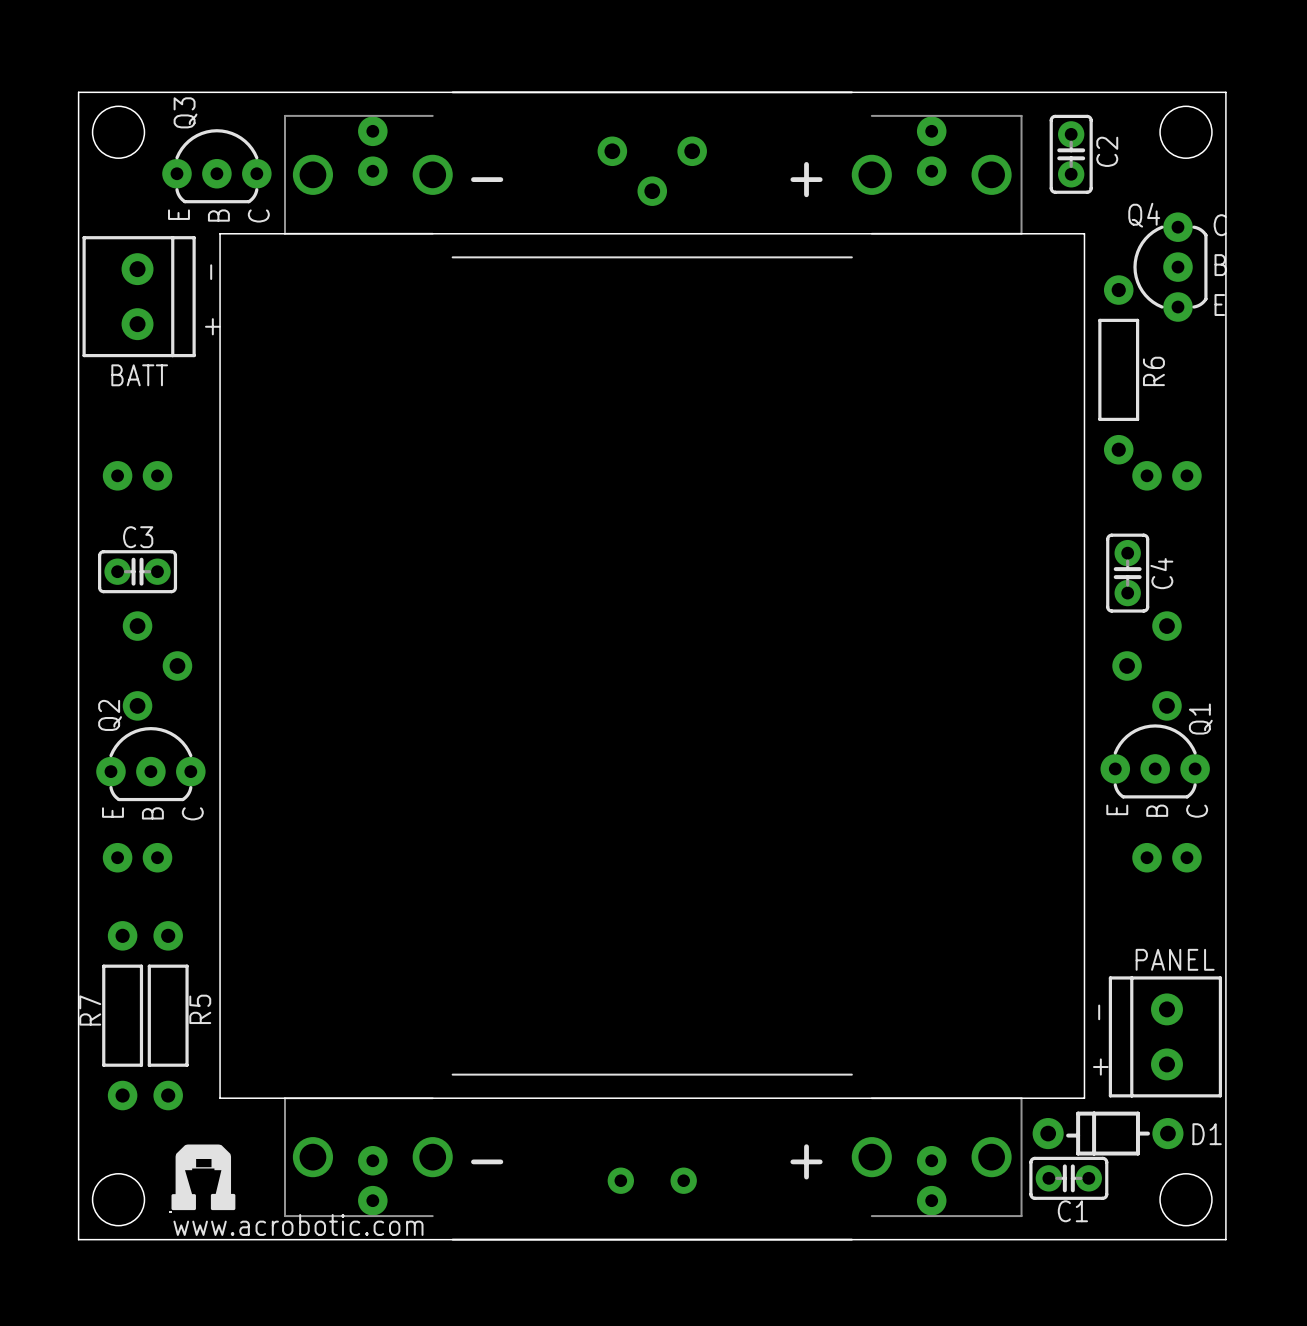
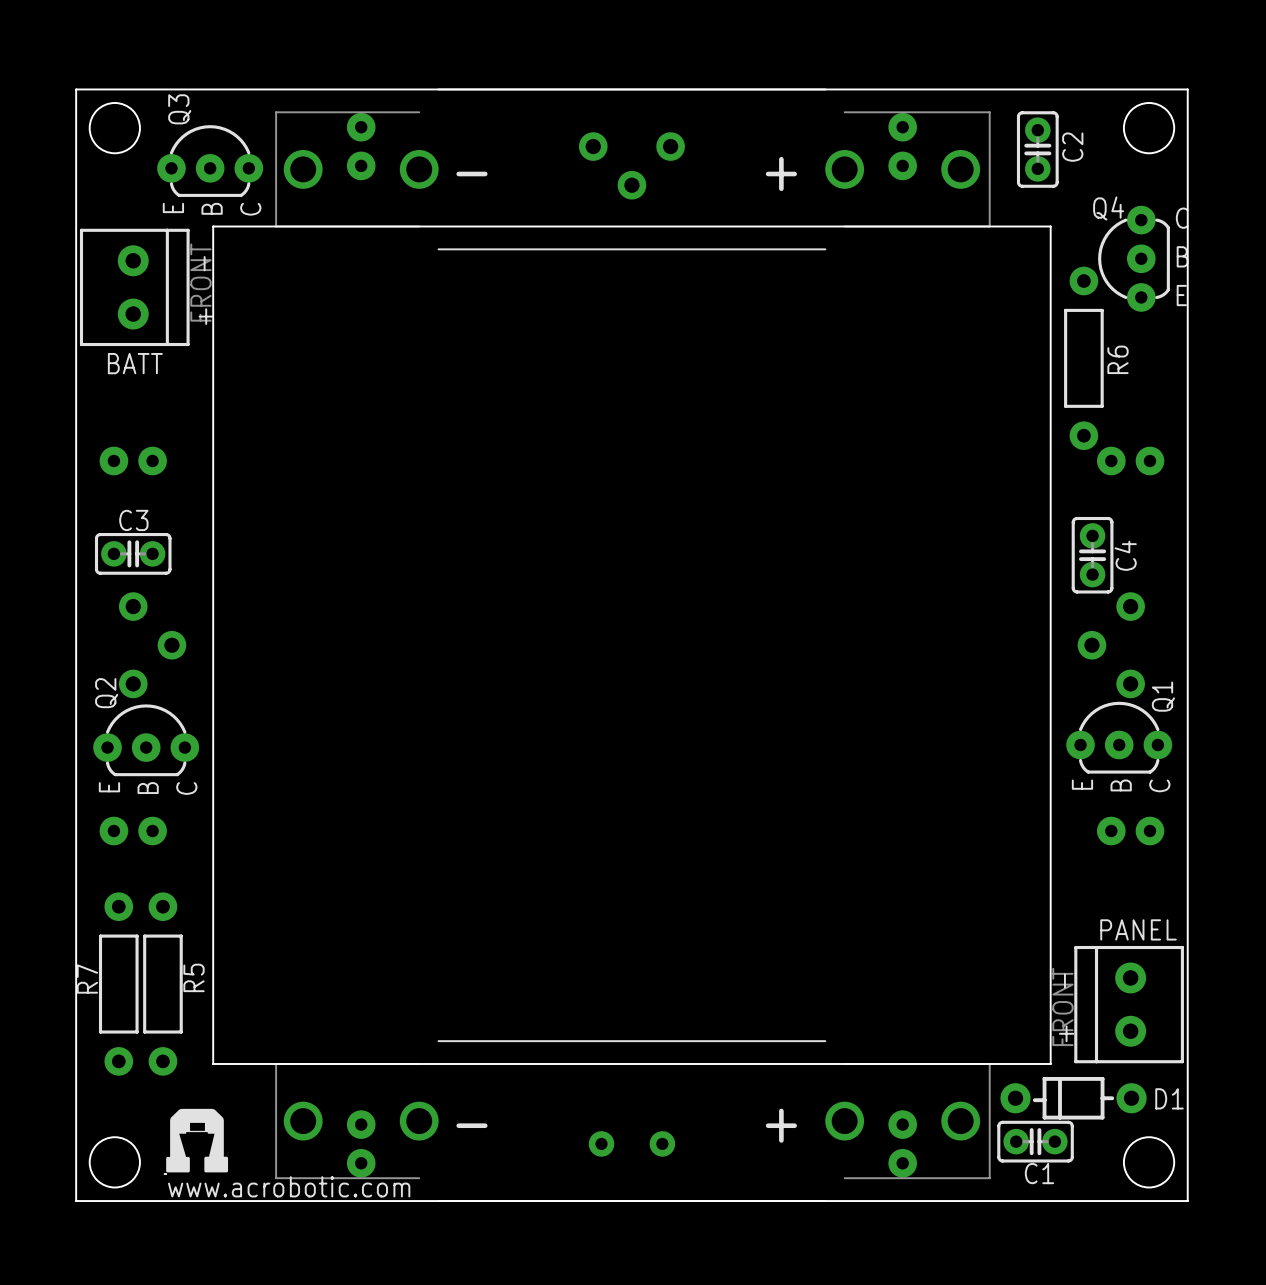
BATT text: none -> FRONT (200, 282)
PANEL text: none -> FRONT (1062, 1006)

